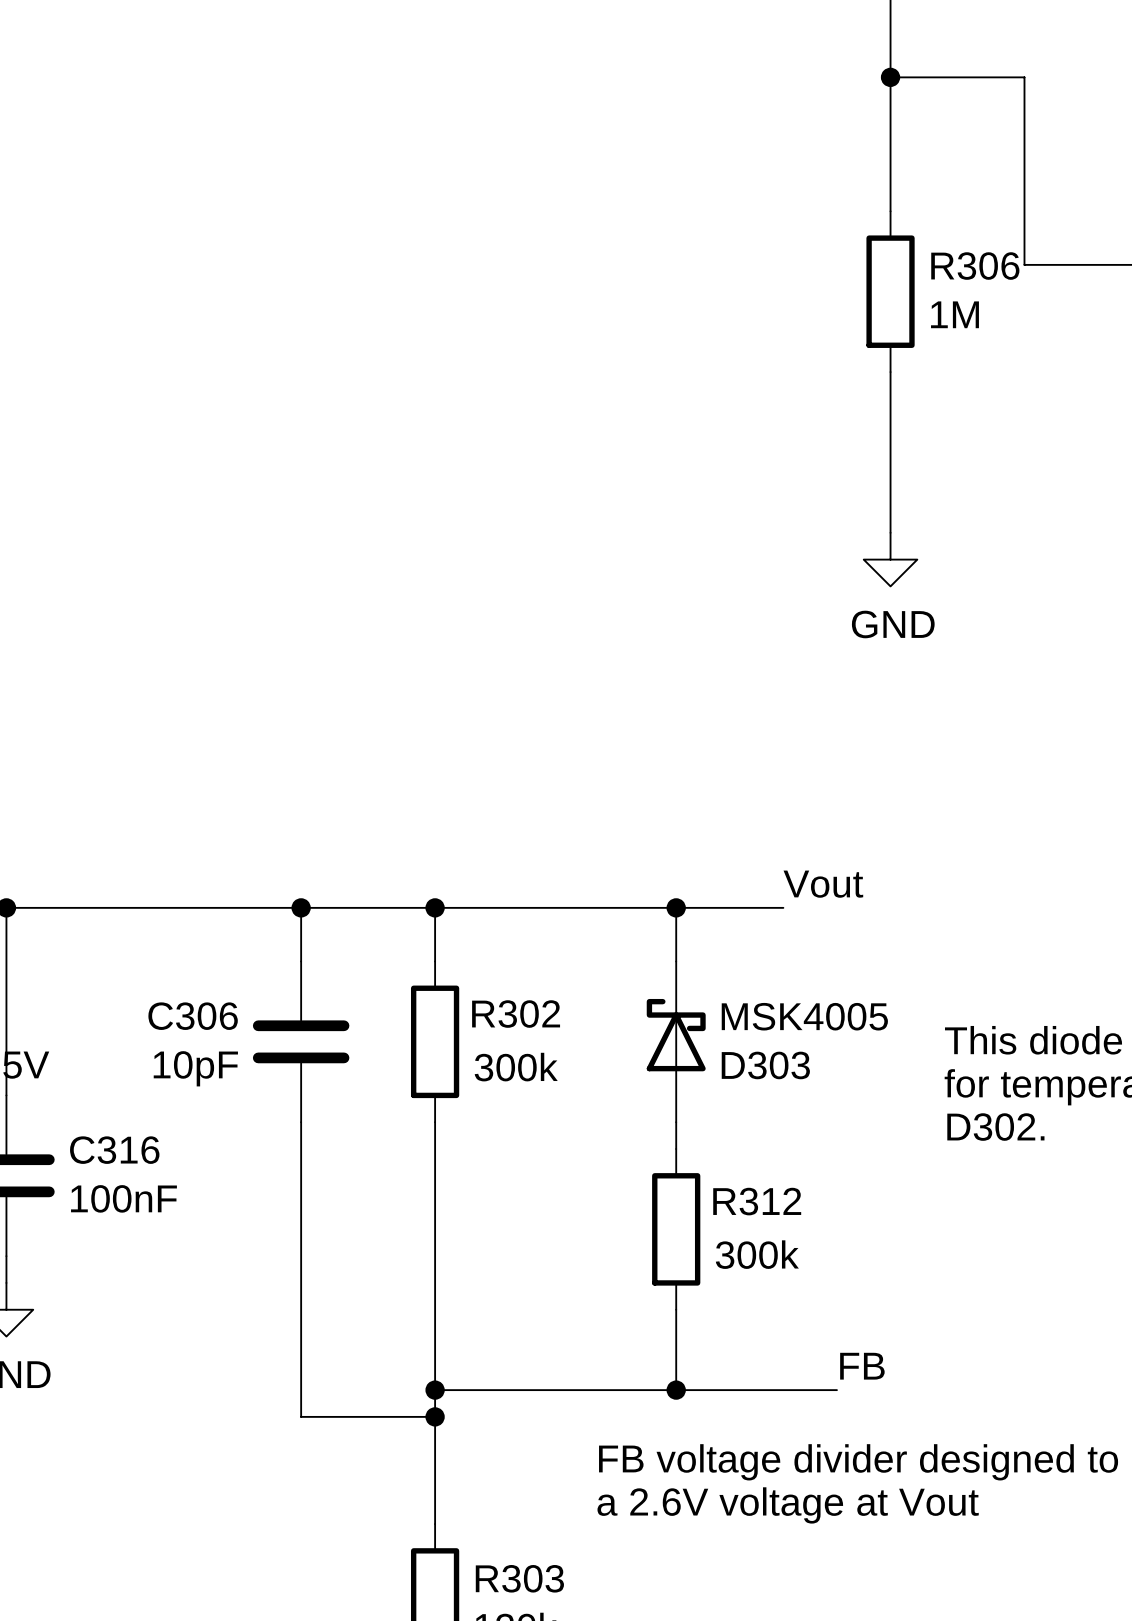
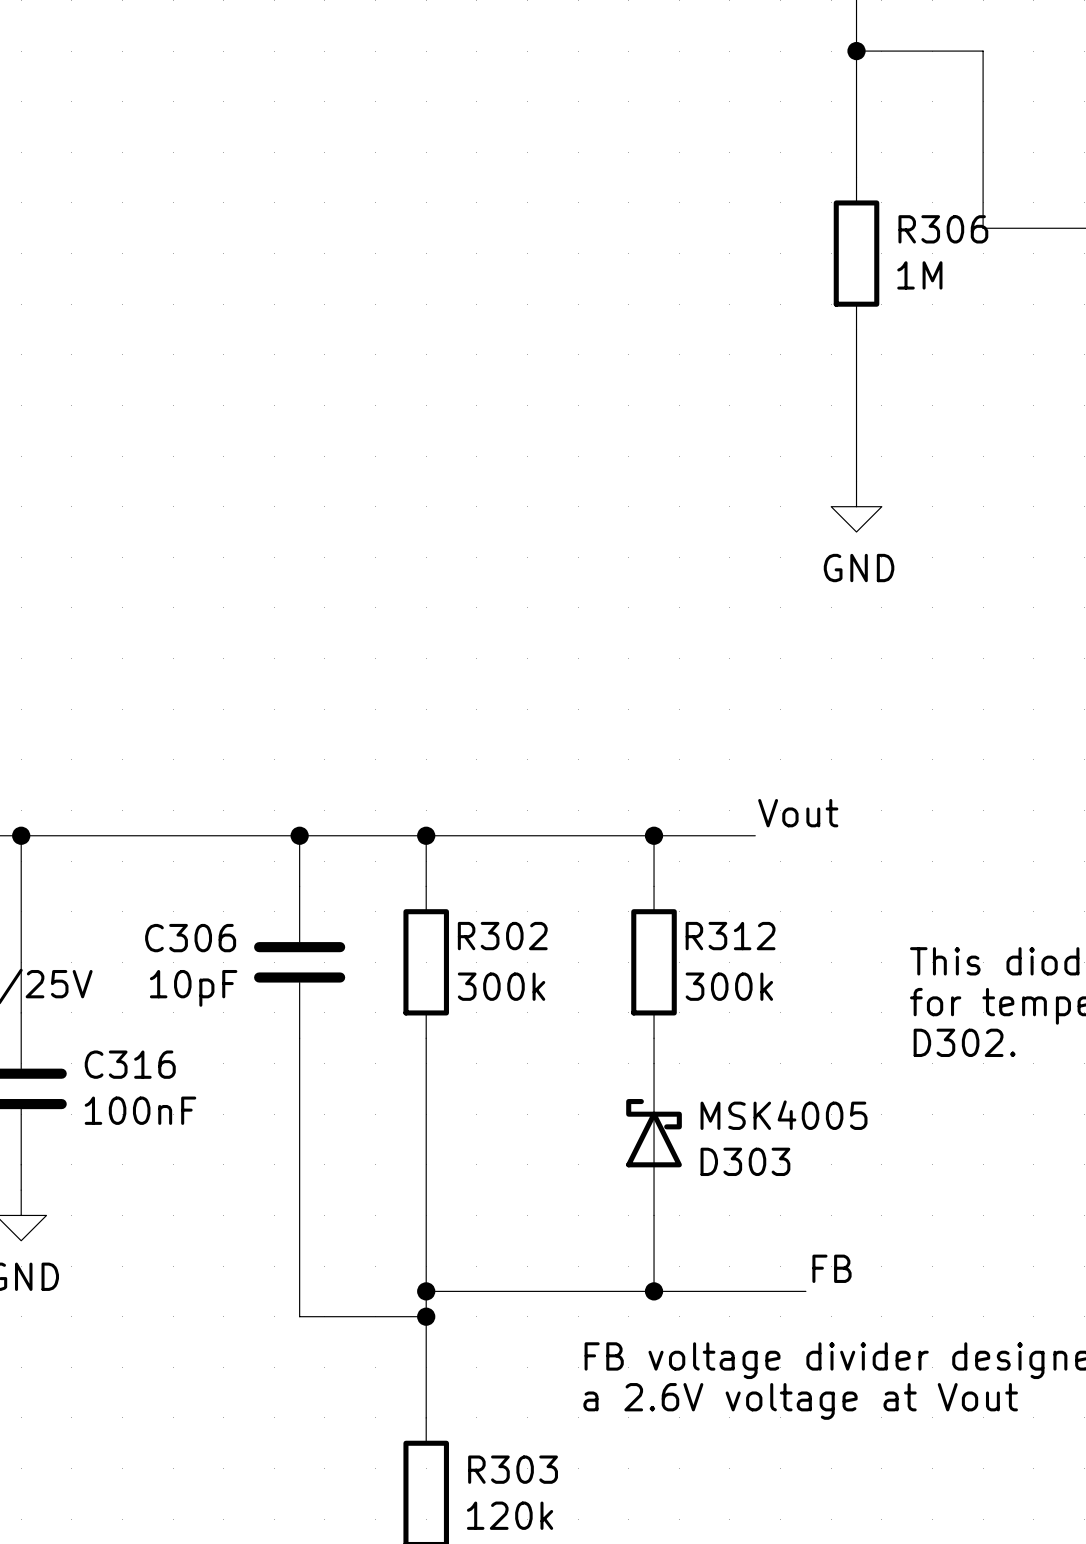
D303 position: (676, 1041) -> (654, 1139)
R312 position: (676, 1229) -> (654, 962)

